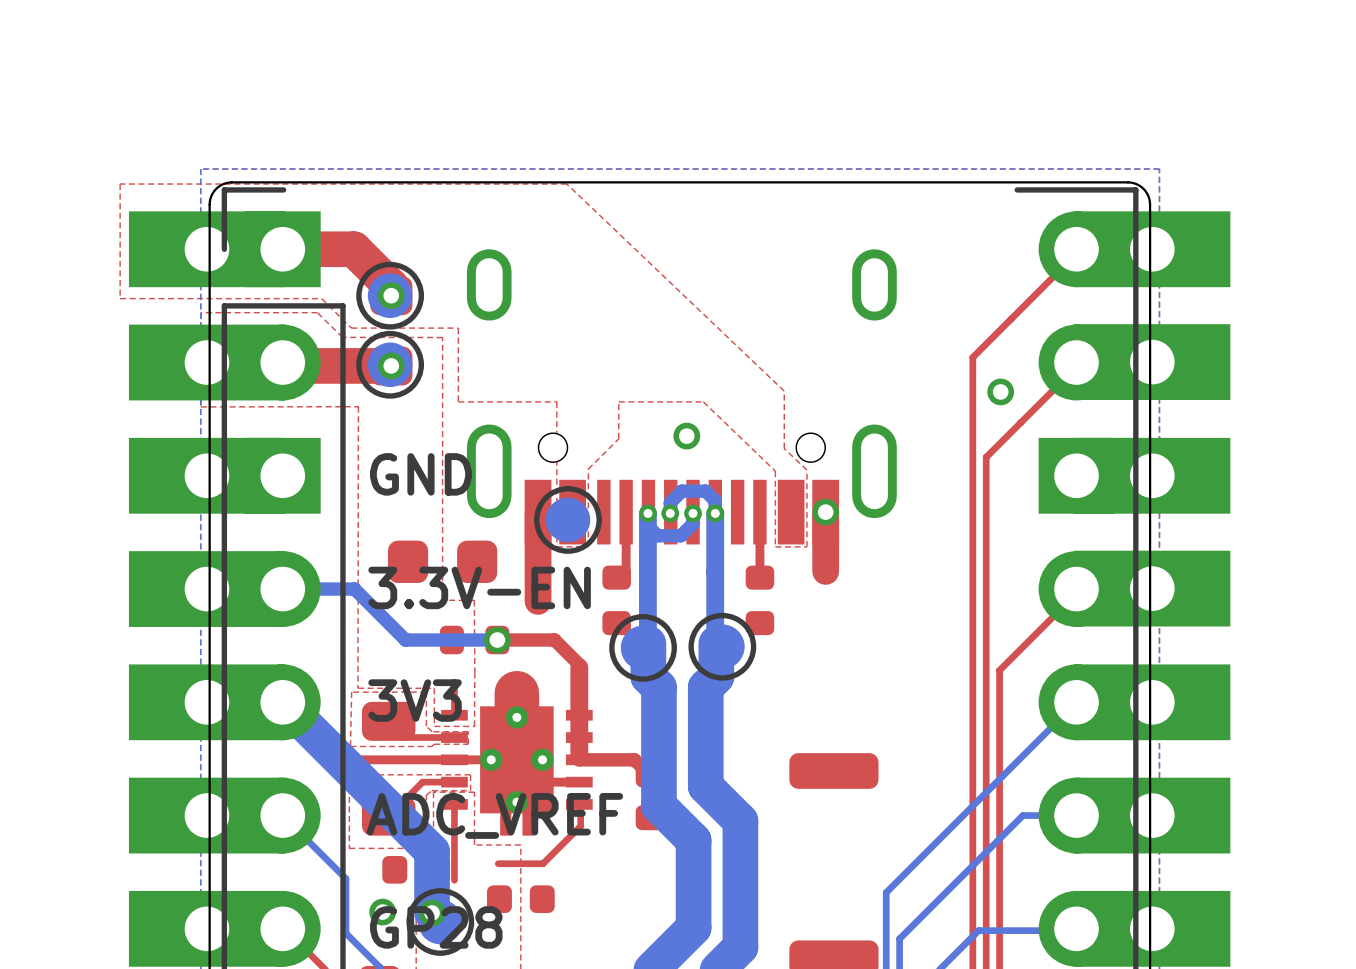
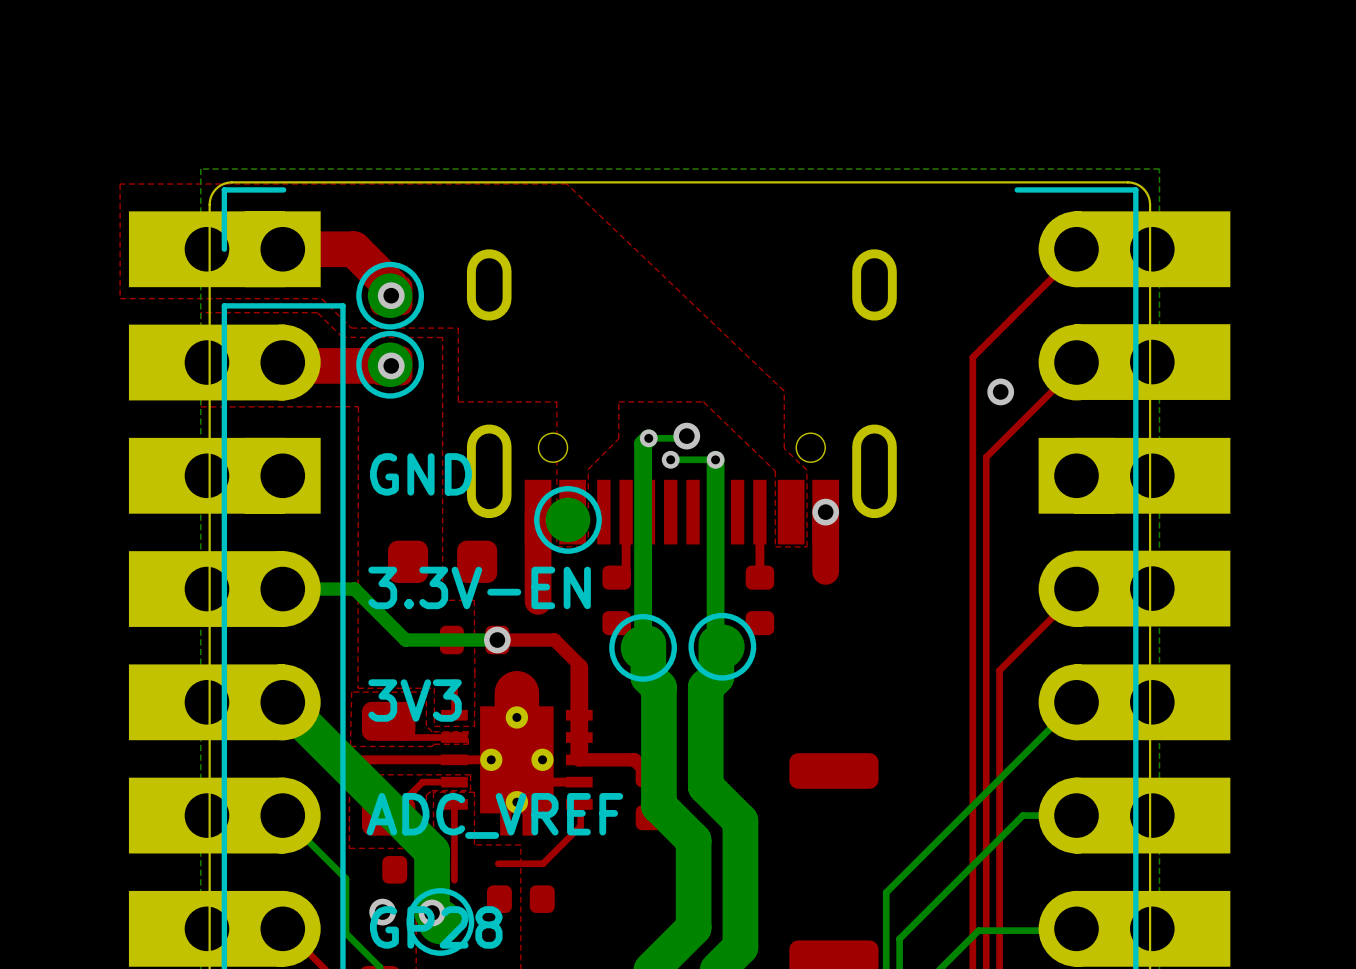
via: none -> (648, 438)
bottom track: none -> (693, 438) (648, 438) (643, 444) (643, 647)
via: none -> (670, 459)
bottom track: none -> (715, 459) (715, 639) (722, 646)
bottom track: none -> (715, 459) (670, 459)
via: none -> (715, 459)
via: (647, 513) -> none
bottom track: (670, 513) (670, 502) (681, 491) (705, 491) (715, 500) (715, 643) -> none
via: (670, 513) -> none
bottom track: (693, 513) (693, 523) (680, 535) (657, 535) (647, 526) (647, 513) (647, 643) -> none
via: (693, 513) -> none
via: (715, 513) -> none

